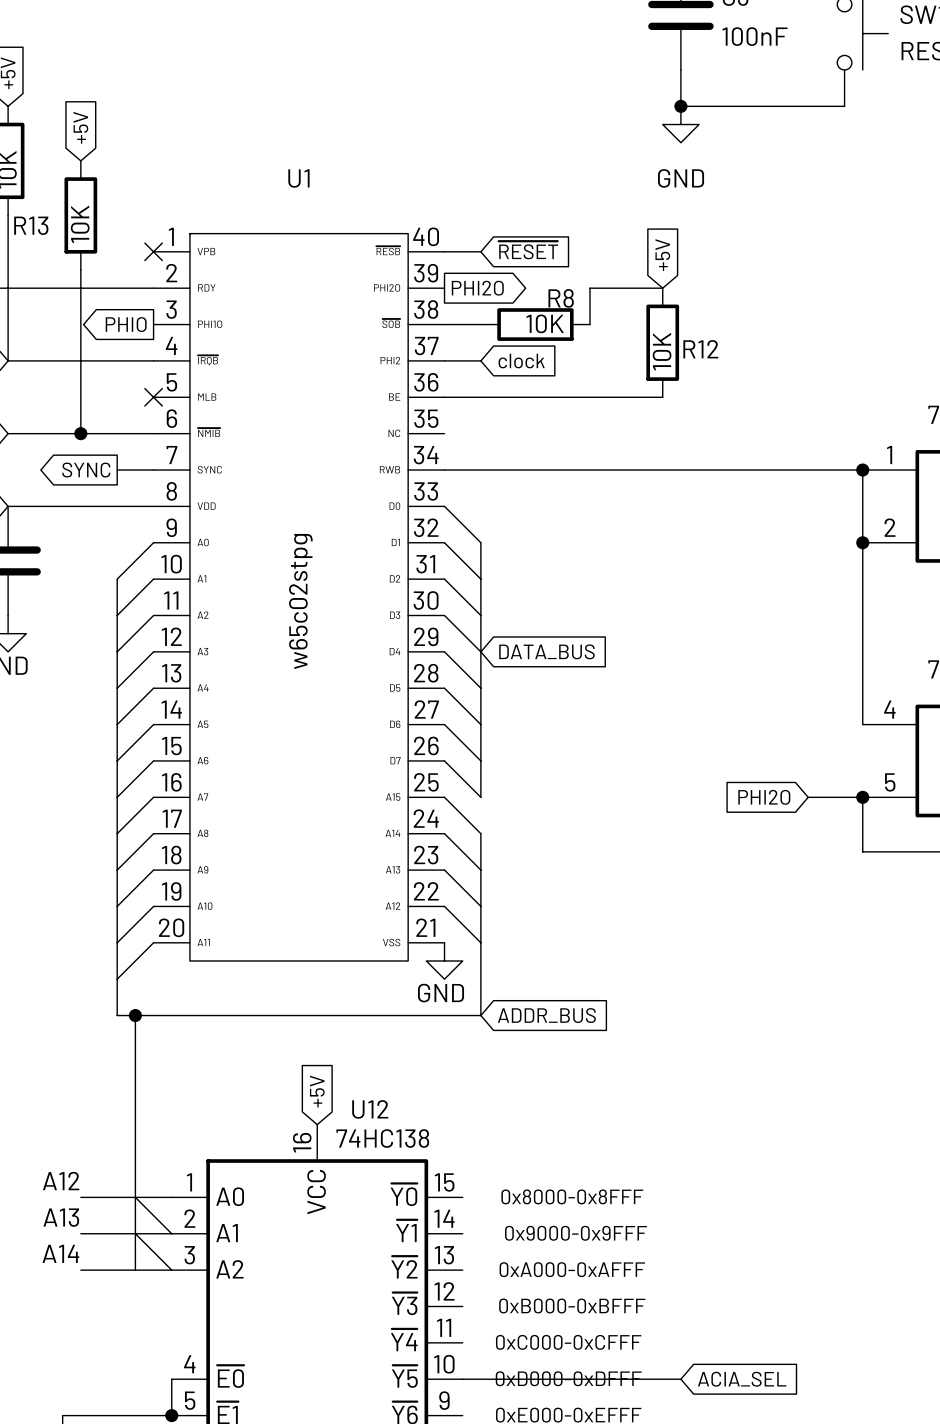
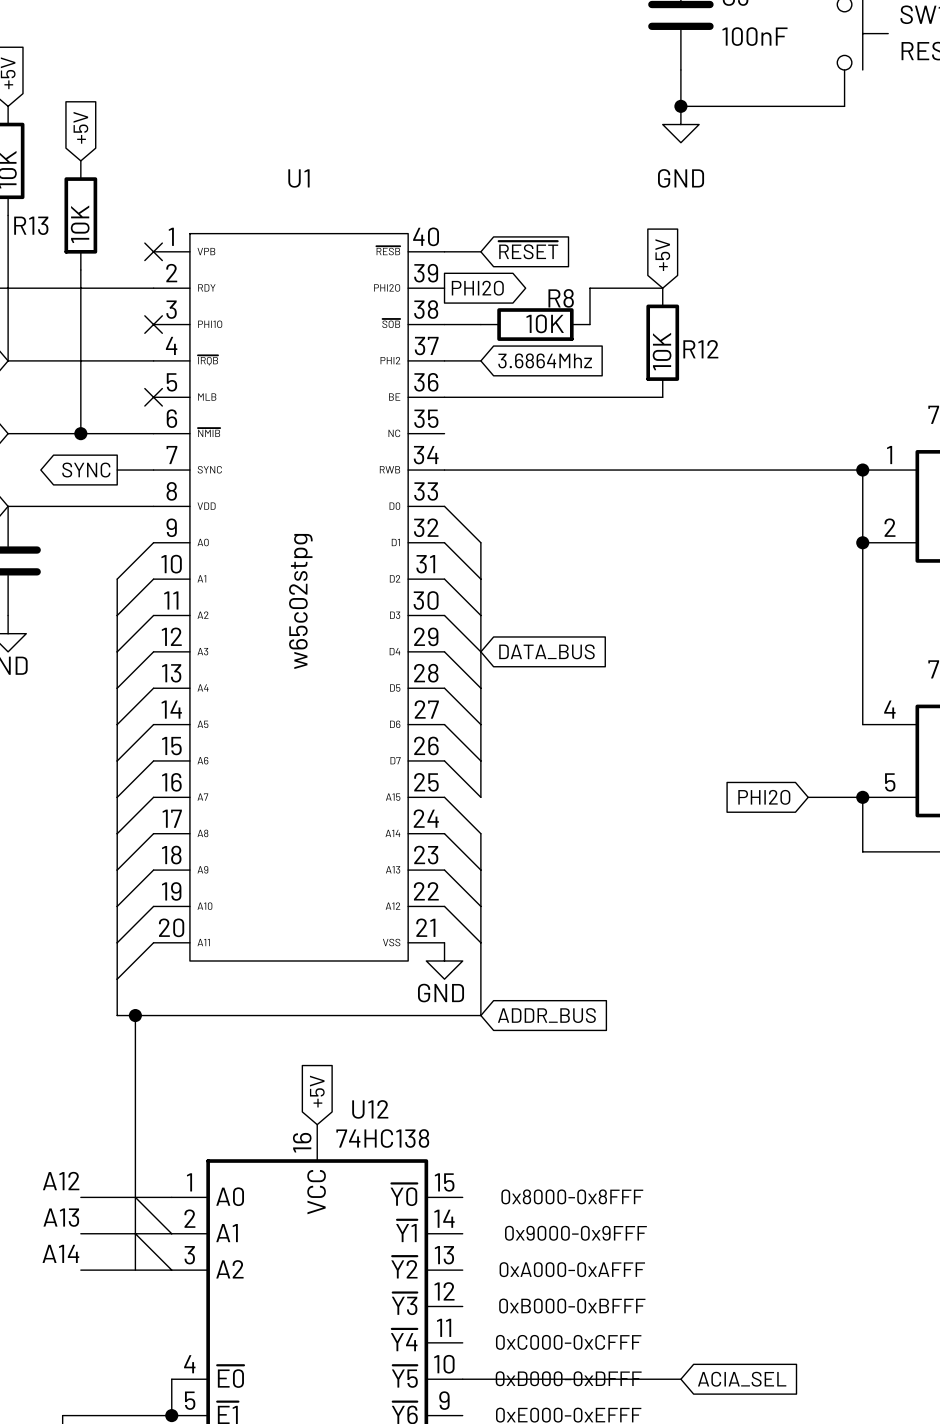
global label: PHIO (126, 324) -> none
no-connect mark: none -> (153, 324)
global label: clock (521, 361) -> 3.6864Mhz (545, 360)

